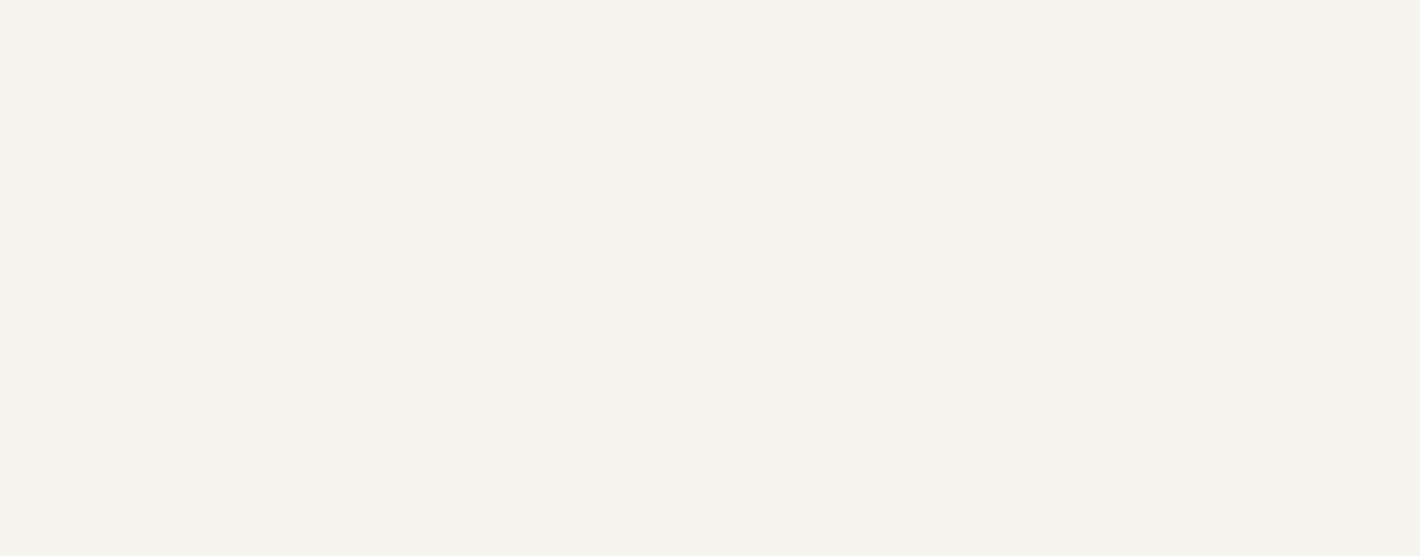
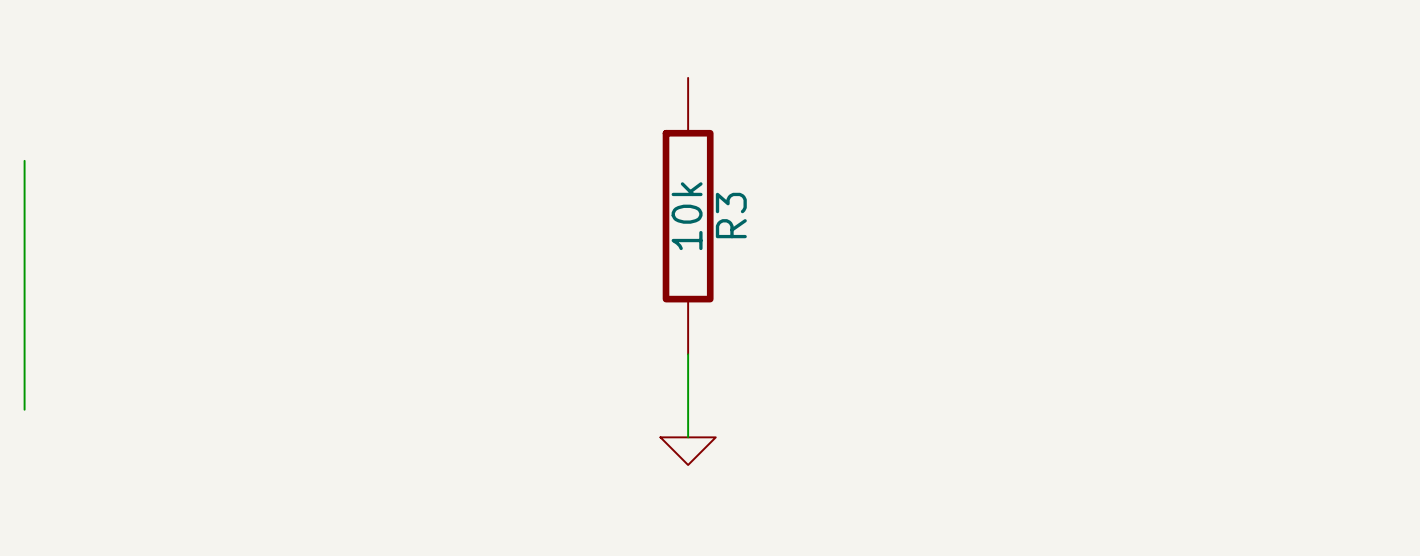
wire: none -> (24, 160) (24, 409)
R3: none -> 10k (688, 216)
wire: none -> (688, 354) (688, 437)
power symbol: none -> (688, 451)

